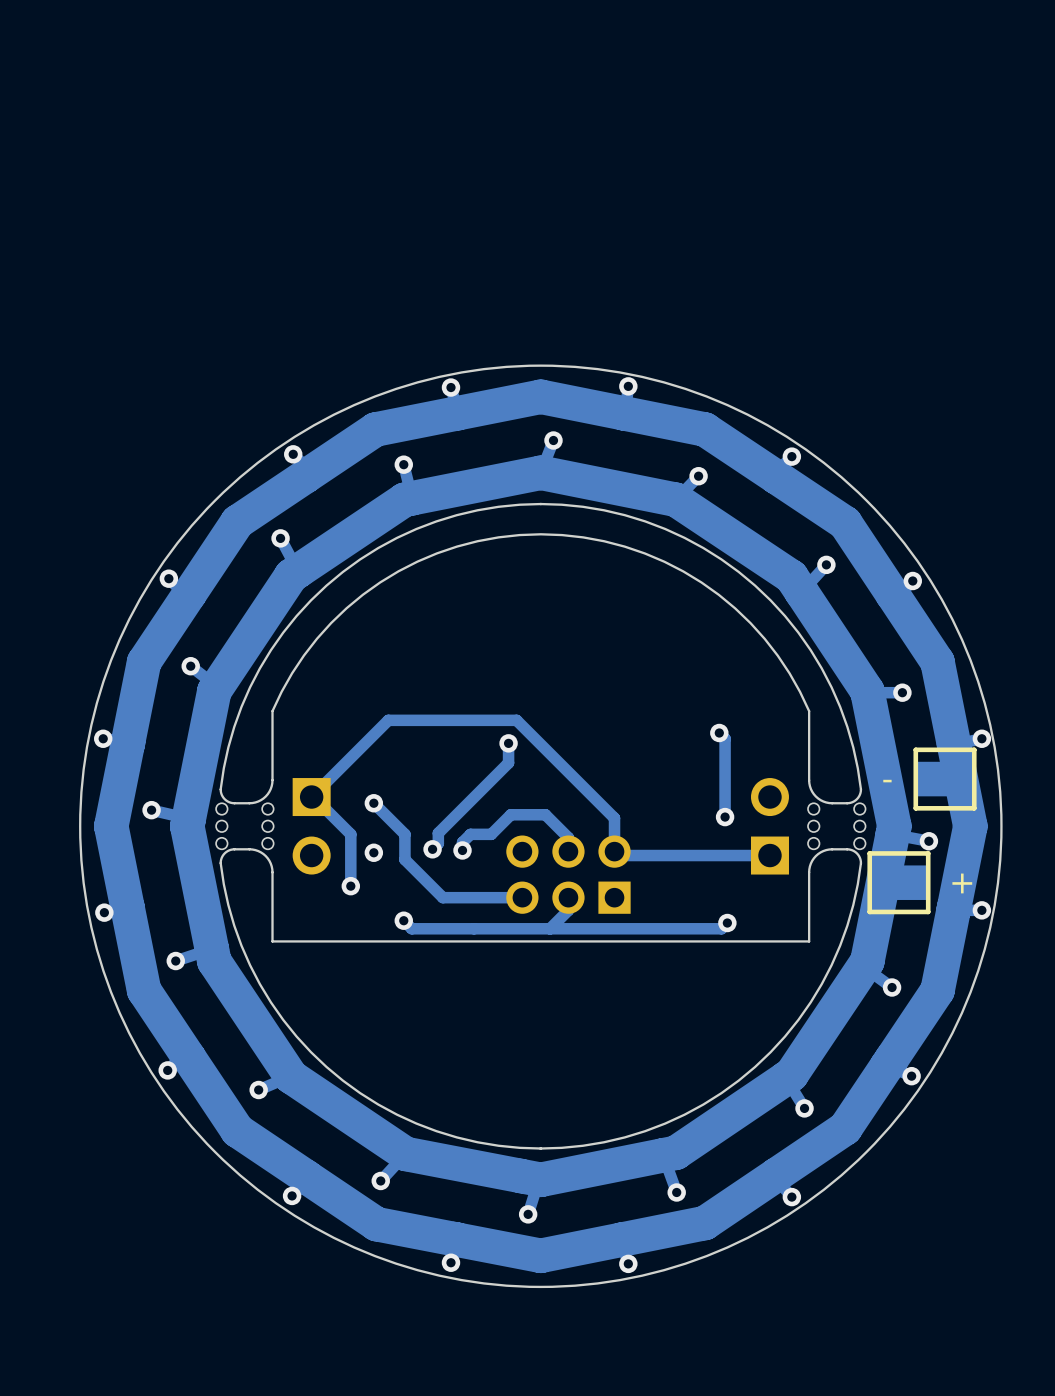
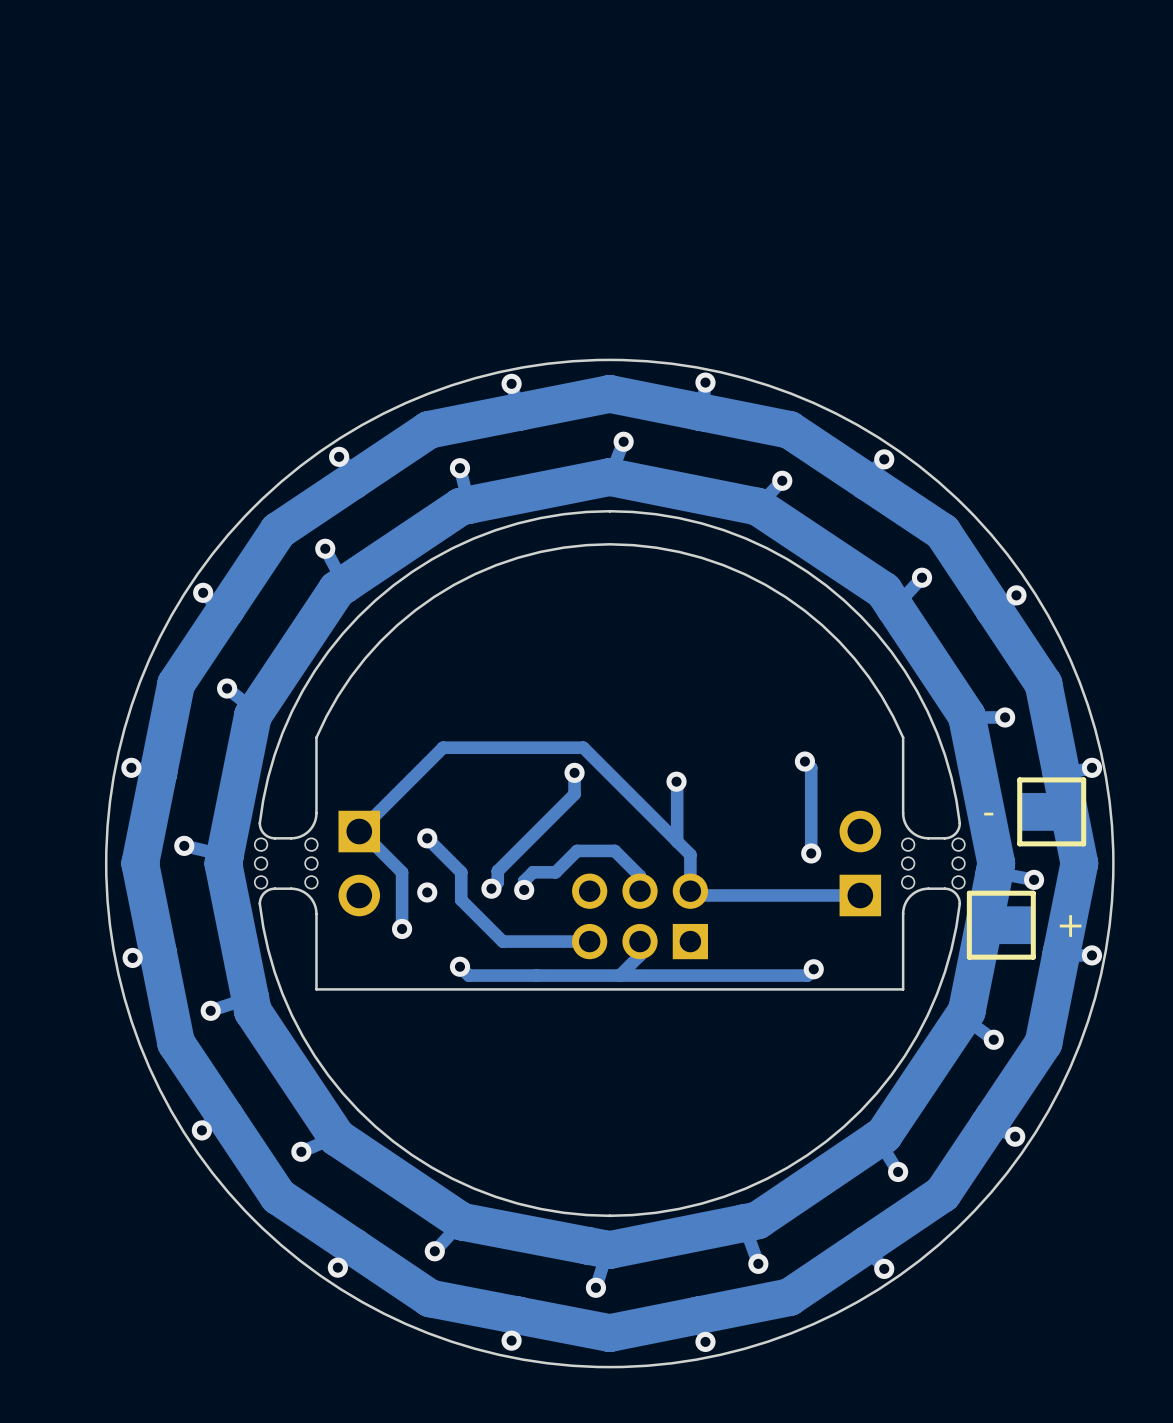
track: none -> (676, 781) (677, 841)
via: none -> (676, 781)

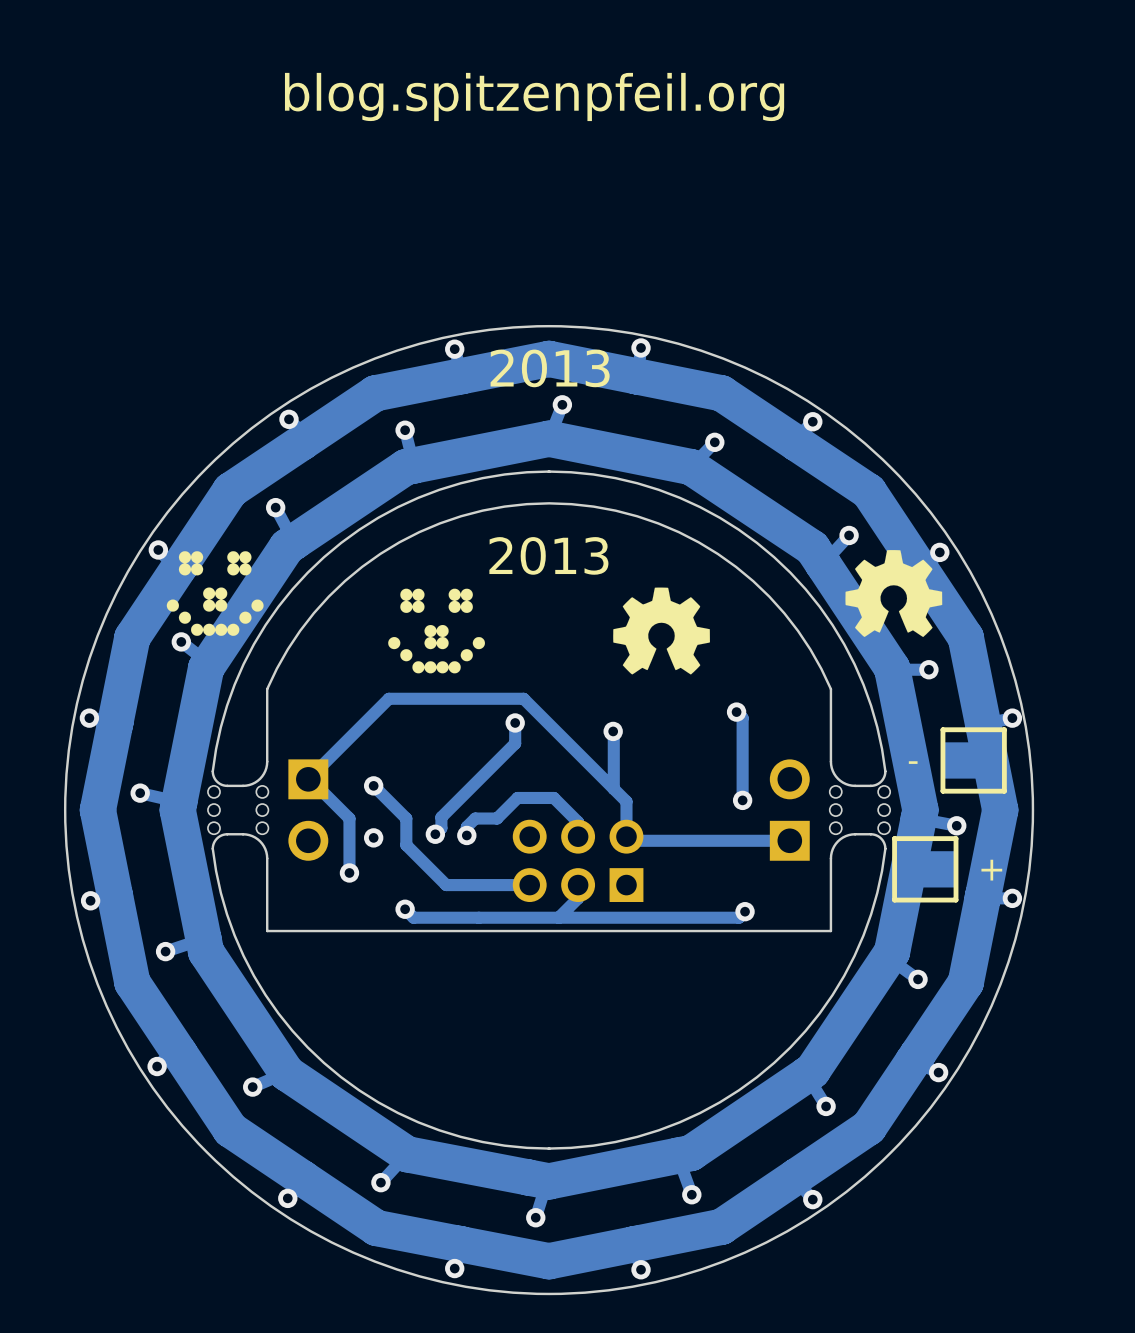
text: none -> blog.spitzenpfeil.org (534, 96)
text: none -> 2013 (550, 368)
drawing: none -> [845, 550, 943, 638]
drawing: none -> [166, 551, 264, 636]
text: none -> 2013 (548, 555)
drawing: none -> [613, 587, 710, 675]
drawing: none -> [388, 588, 485, 674]

